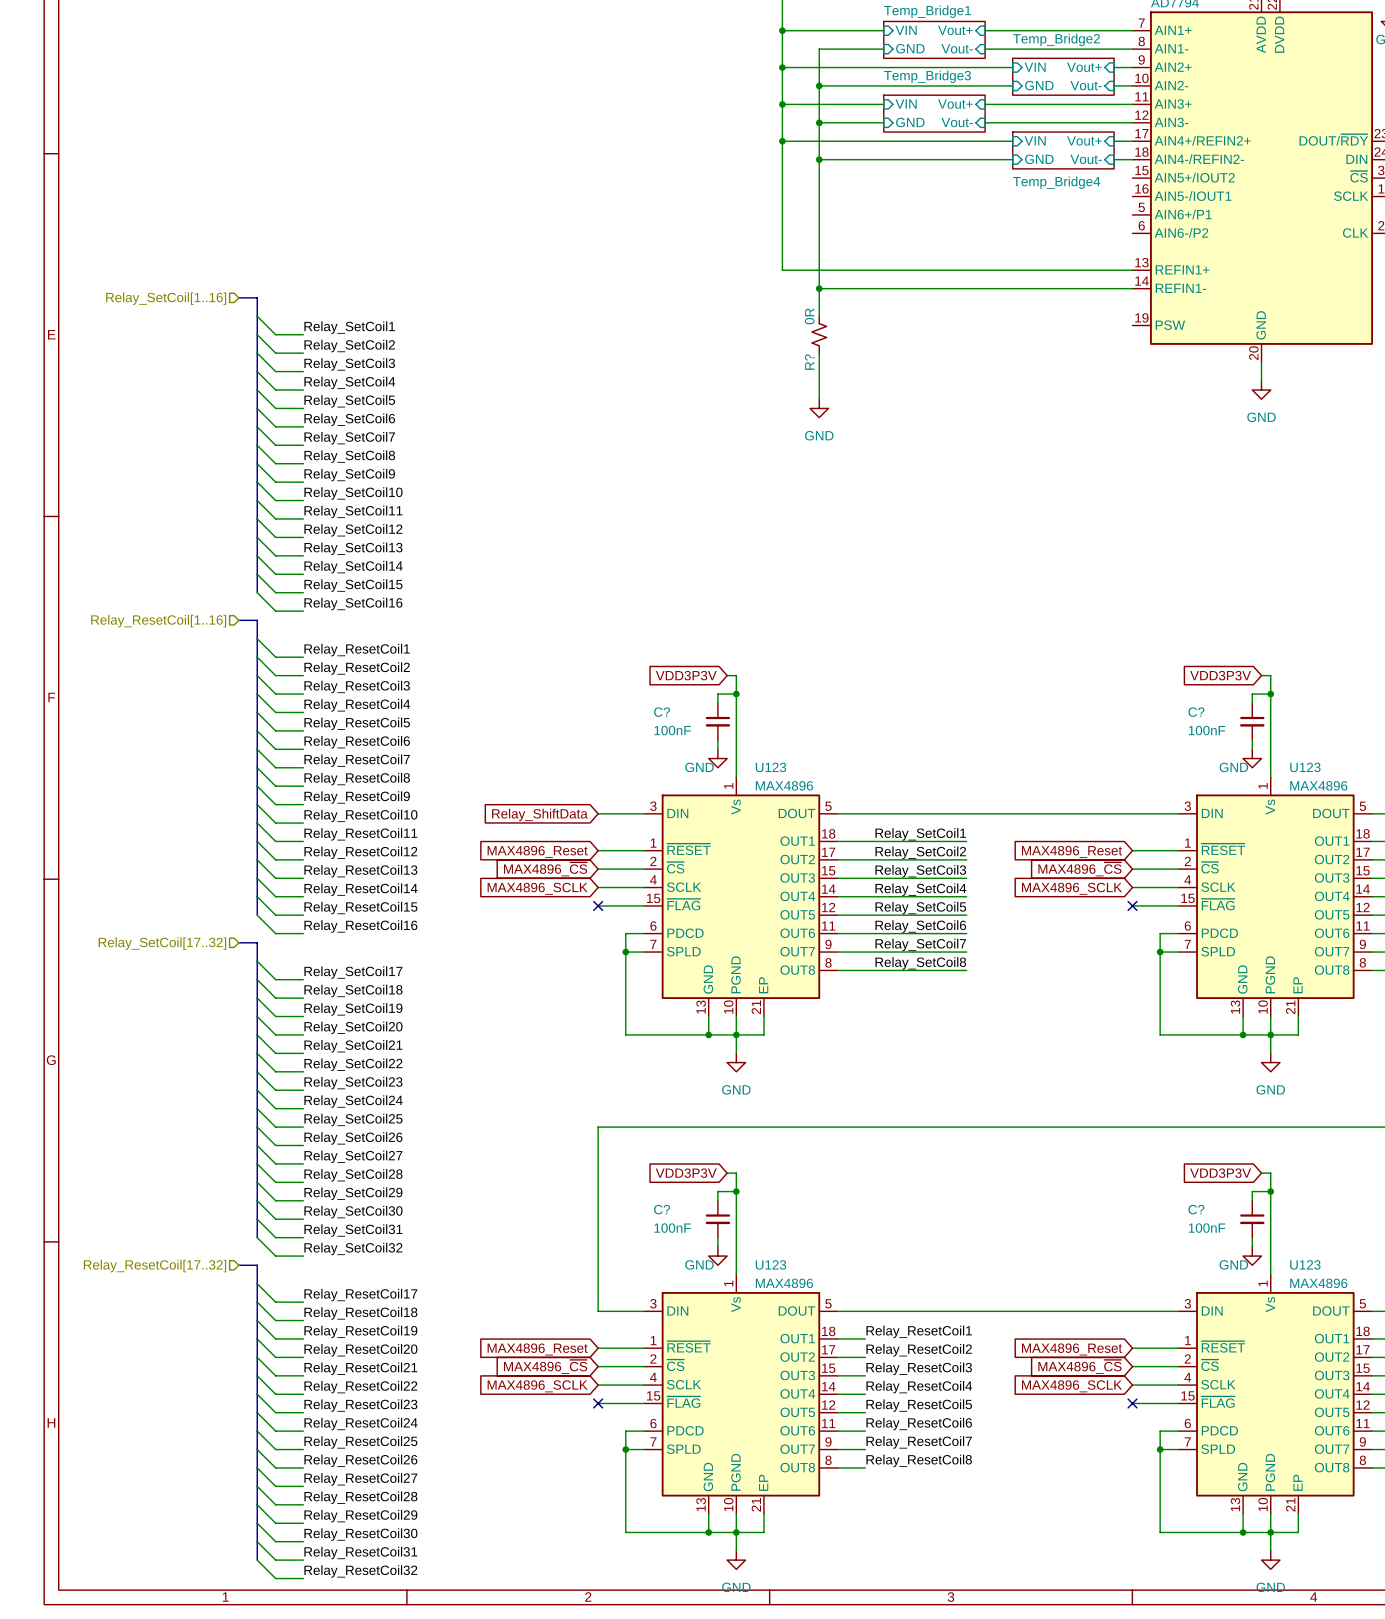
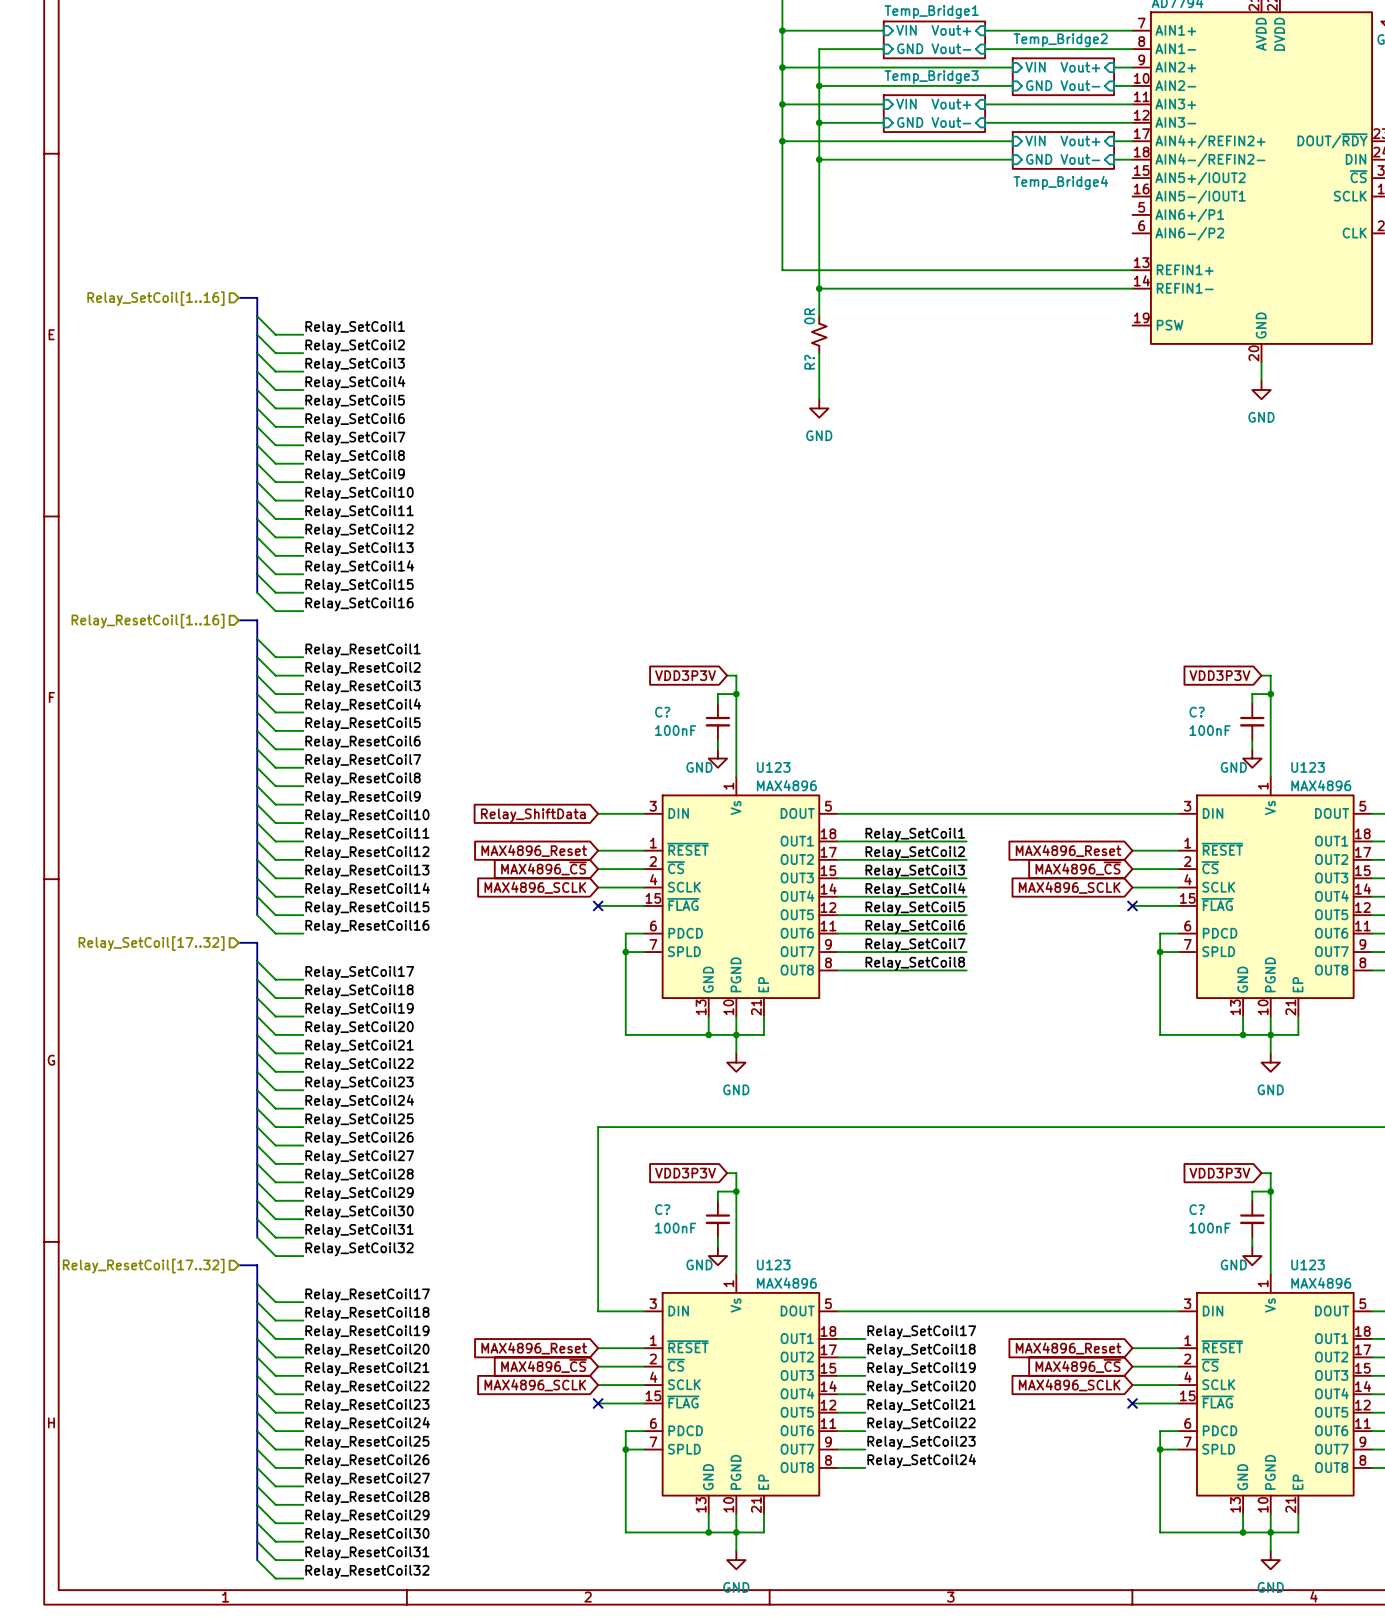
label: Relay_ResetCoil1 (919, 1331) -> Relay_SetCoil17 (921, 1332)
label: Relay_ResetCoil2 (919, 1350) -> Relay_SetCoil18 (921, 1350)
label: Relay_ResetCoil3 (919, 1368) -> Relay_SetCoil19 (921, 1369)
label: Relay_ResetCoil4 (919, 1387) -> Relay_SetCoil20 (921, 1387)
label: Relay_ResetCoil5 (919, 1405) -> Relay_SetCoil21 (921, 1406)
label: Relay_ResetCoil6 (919, 1424) -> Relay_SetCoil22 (921, 1424)
label: Relay_ResetCoil7 (919, 1442) -> Relay_SetCoil23 (921, 1442)
label: Relay_ResetCoil8 (919, 1460) -> Relay_SetCoil24 (921, 1461)

